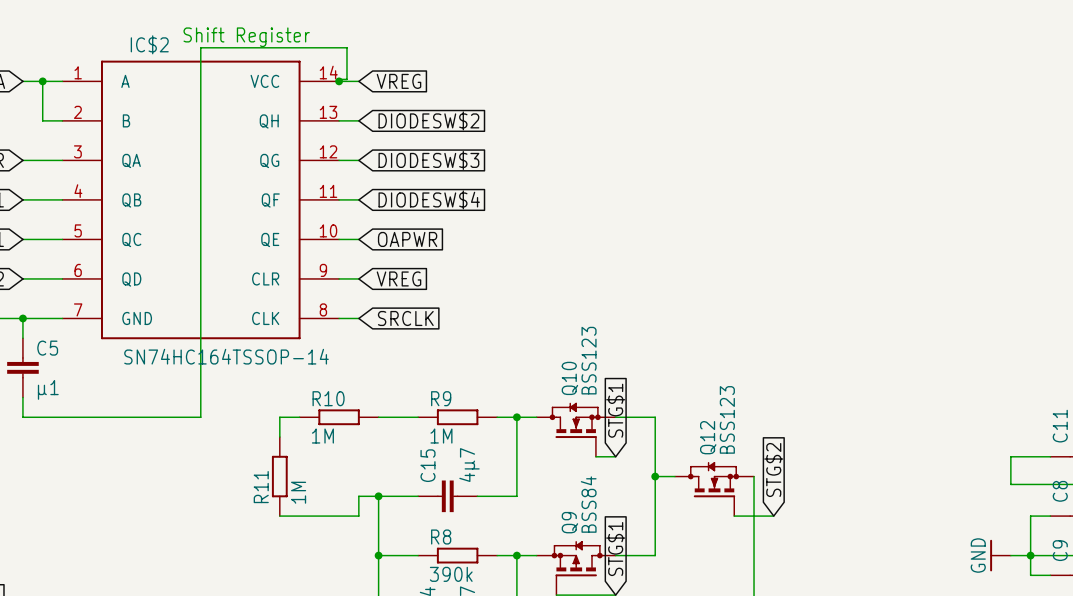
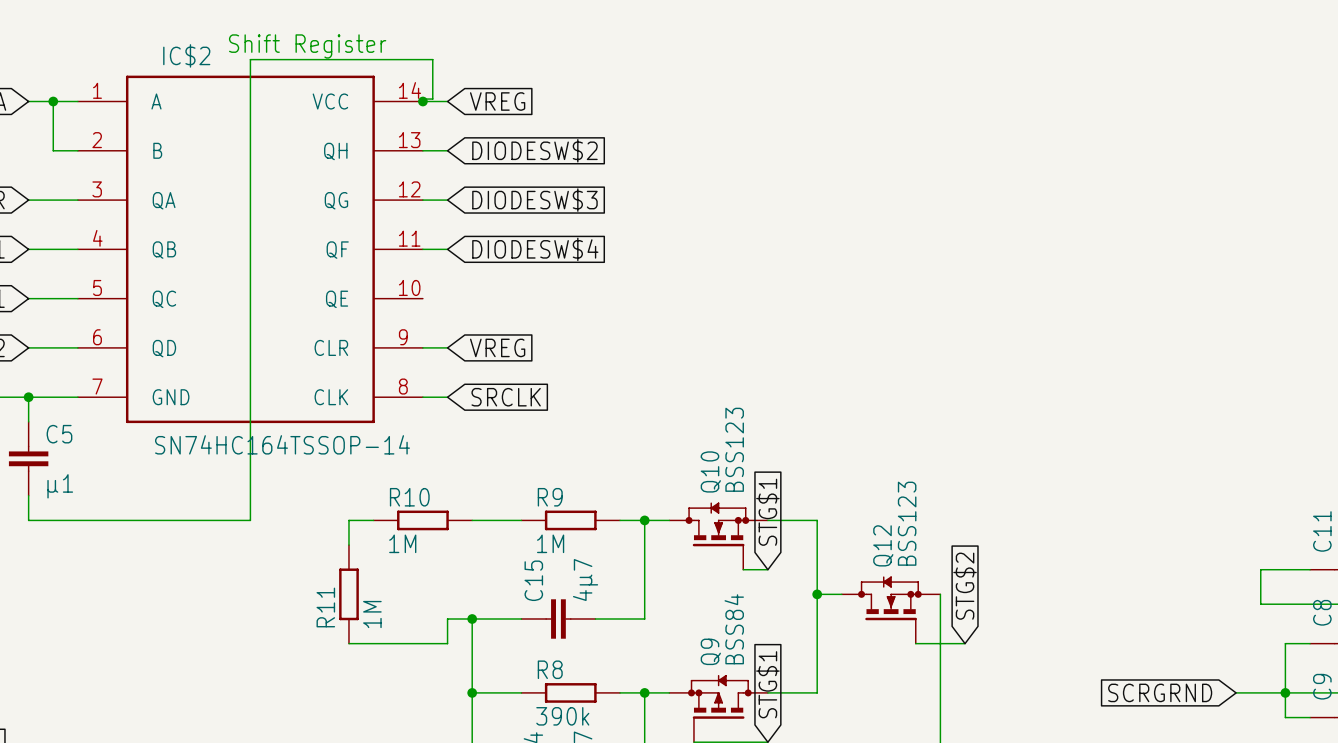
wire: (339, 239) (358, 239) -> none
global label: OAPWR (407, 239) -> none
global label: none -> SCRGRND (1160, 692)
power symbol: GND (1000, 555) -> none

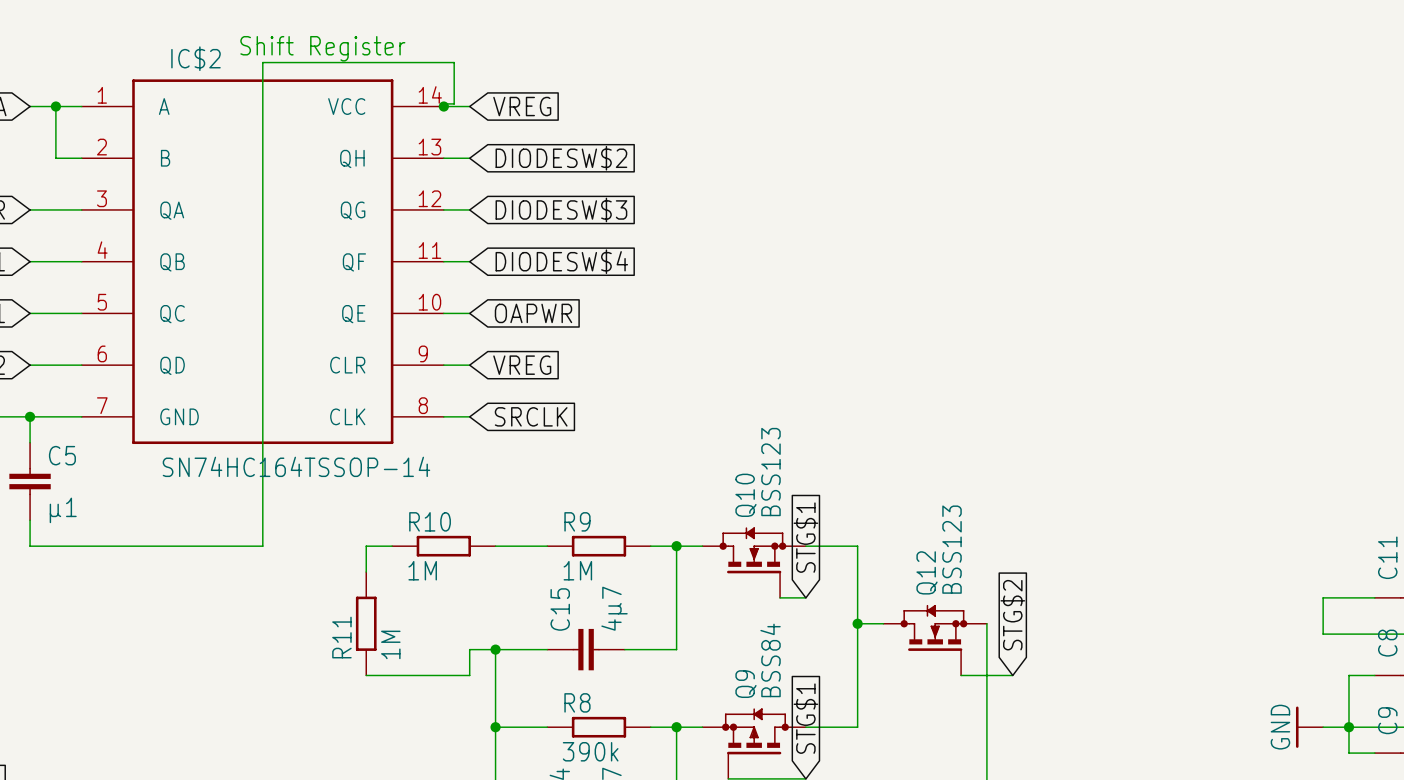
wire: none -> (443, 313) (469, 313)
global label: none -> OAPWR (533, 313)
global label: SCRGRND (1160, 692) -> none
power symbol: none -> GND (1309, 727)

